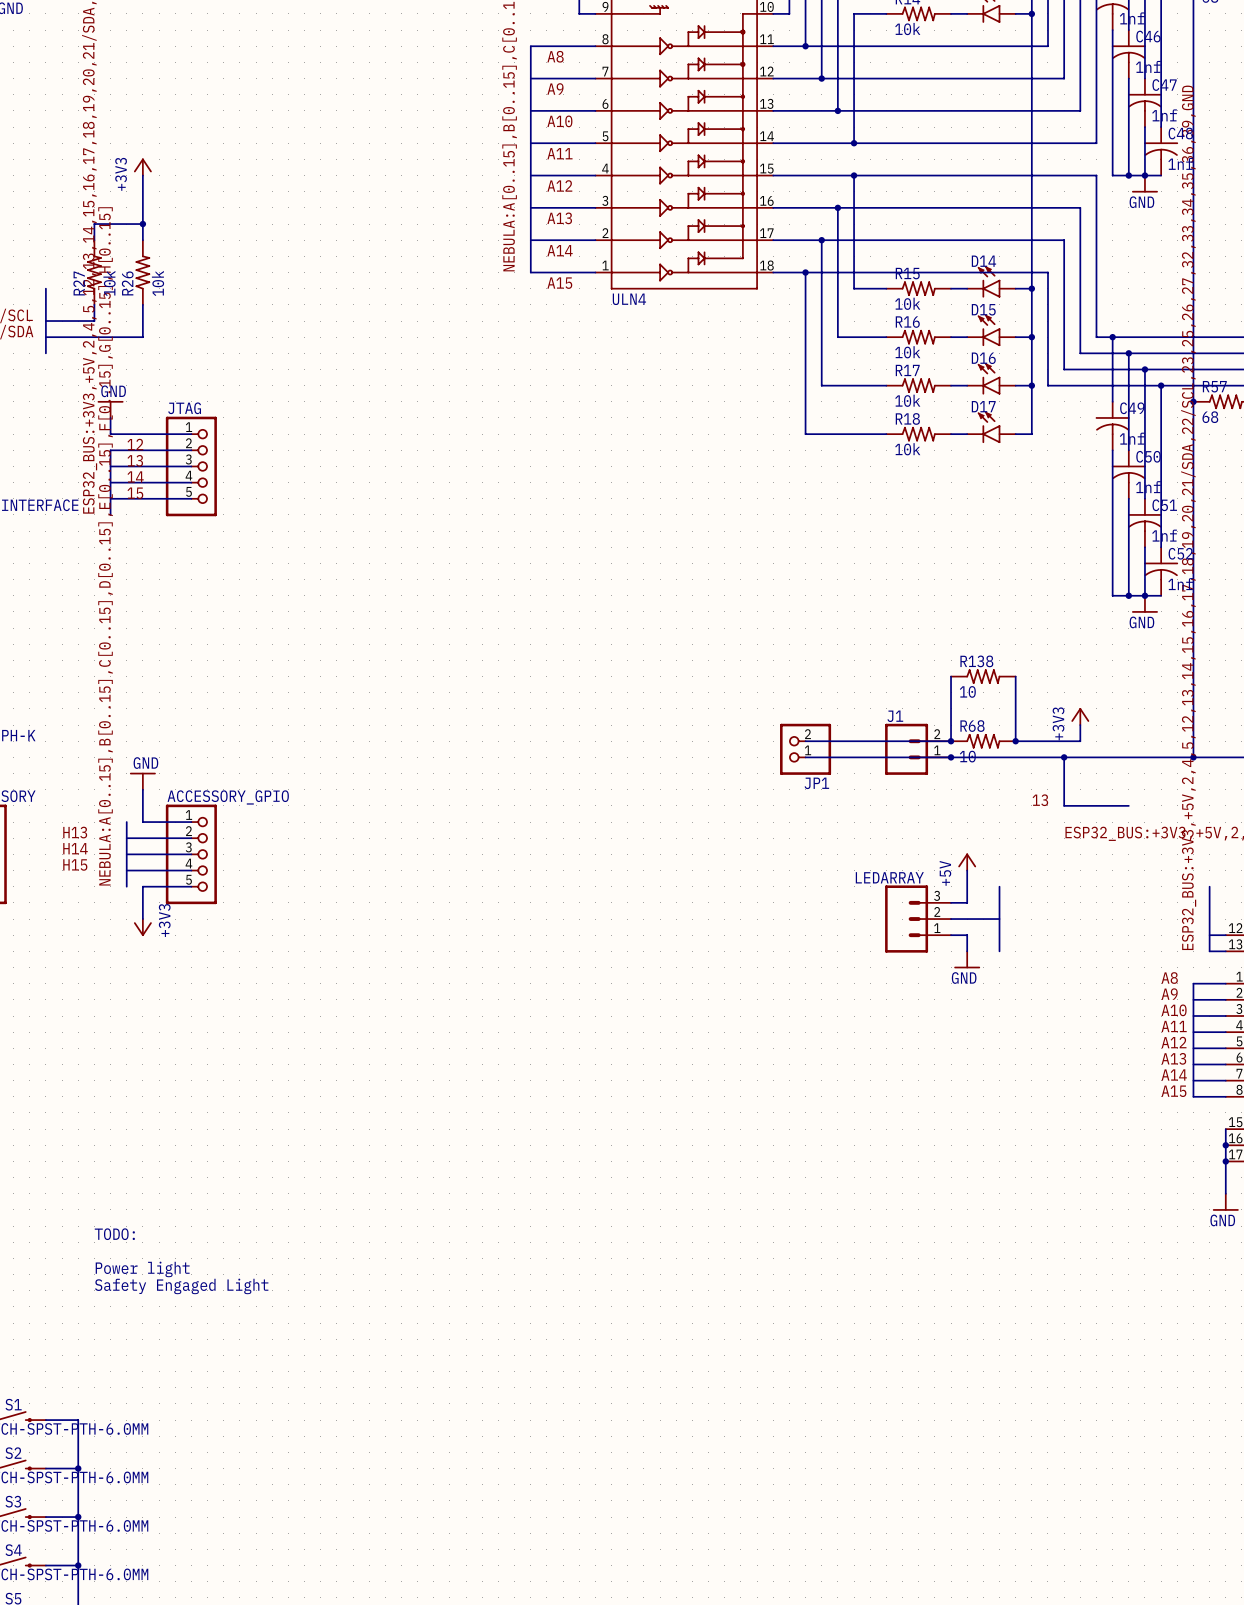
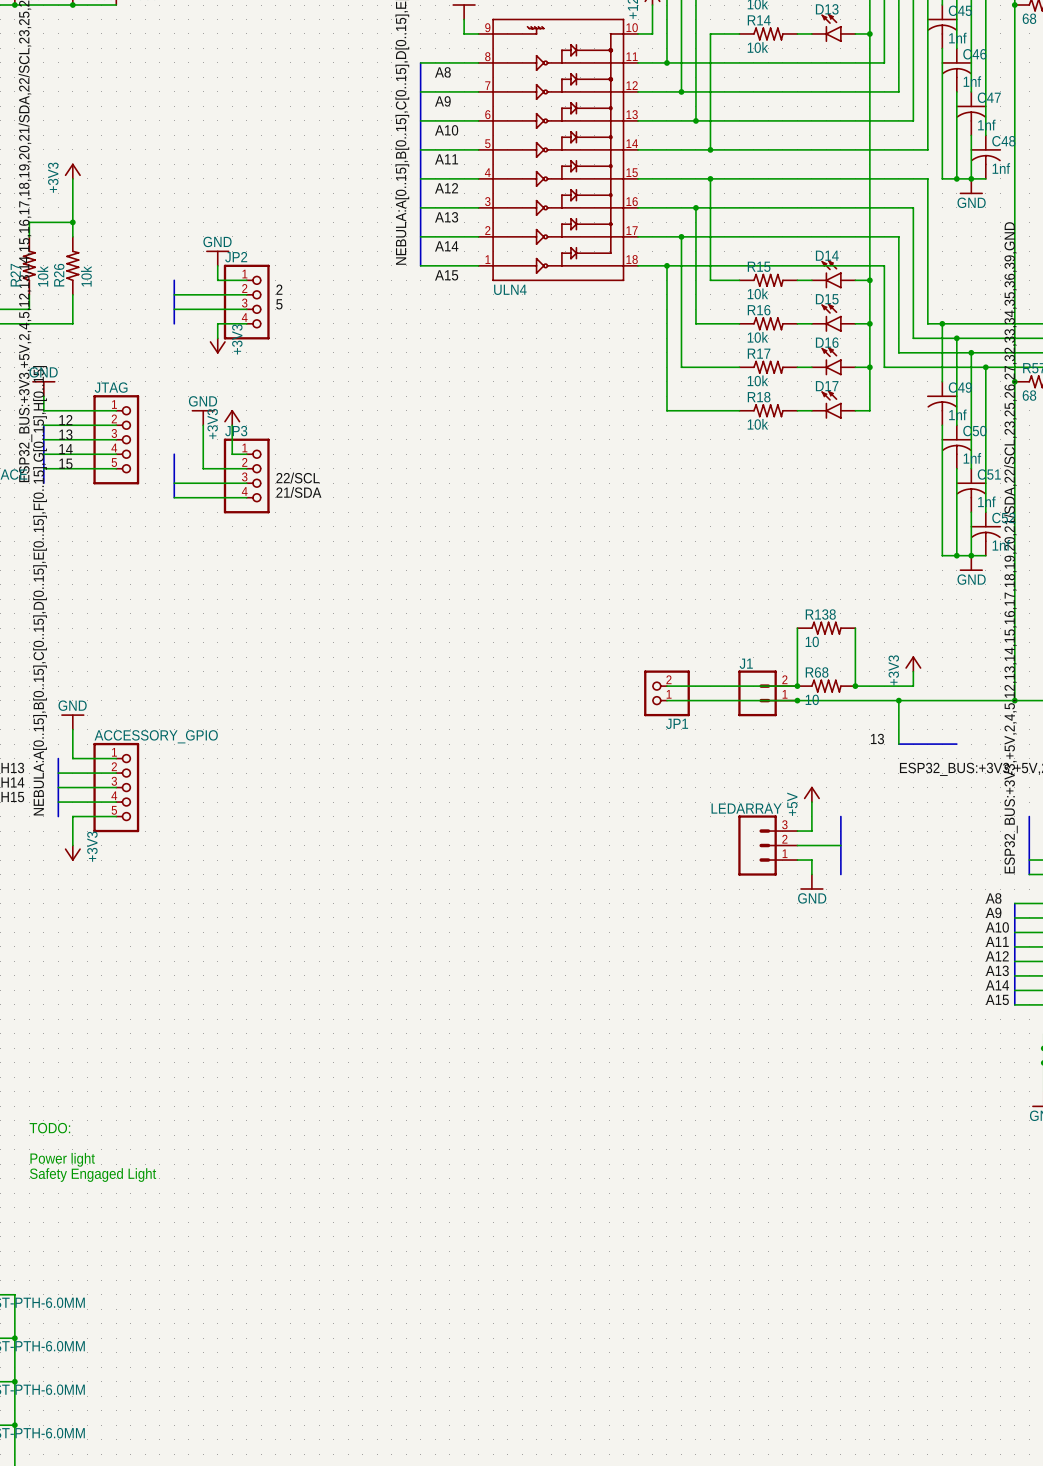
power symbol: none -> GND (217, 258)
wire: none -> (217, 265) (217, 280) (246, 280)
bus: none -> (174, 280) (174, 323)
label: none -> 2 (279, 289)
wire: none -> (174, 294) (246, 294)
JP2: none -> (246, 302)
label: none -> 5 (279, 304)
wire: none -> (174, 309) (246, 309)
wire: none -> (246, 323) (217, 323) (217, 338)
power symbol: none -> +3V3 (217, 345)
power symbol: none -> GND (203, 417)
power symbol: none -> +3V3 (232, 417)
wire: none -> (203, 425) (203, 468) (246, 468)
wire: none -> (232, 425) (232, 454) (246, 454)
bus: none -> (174, 454) (174, 497)
JP3: none -> (246, 475)
label: none -> 22/SCL (297, 477)
wire: none -> (174, 483) (246, 483)
label: none -> 21/SDA (298, 492)
wire: none -> (174, 497) (246, 497)

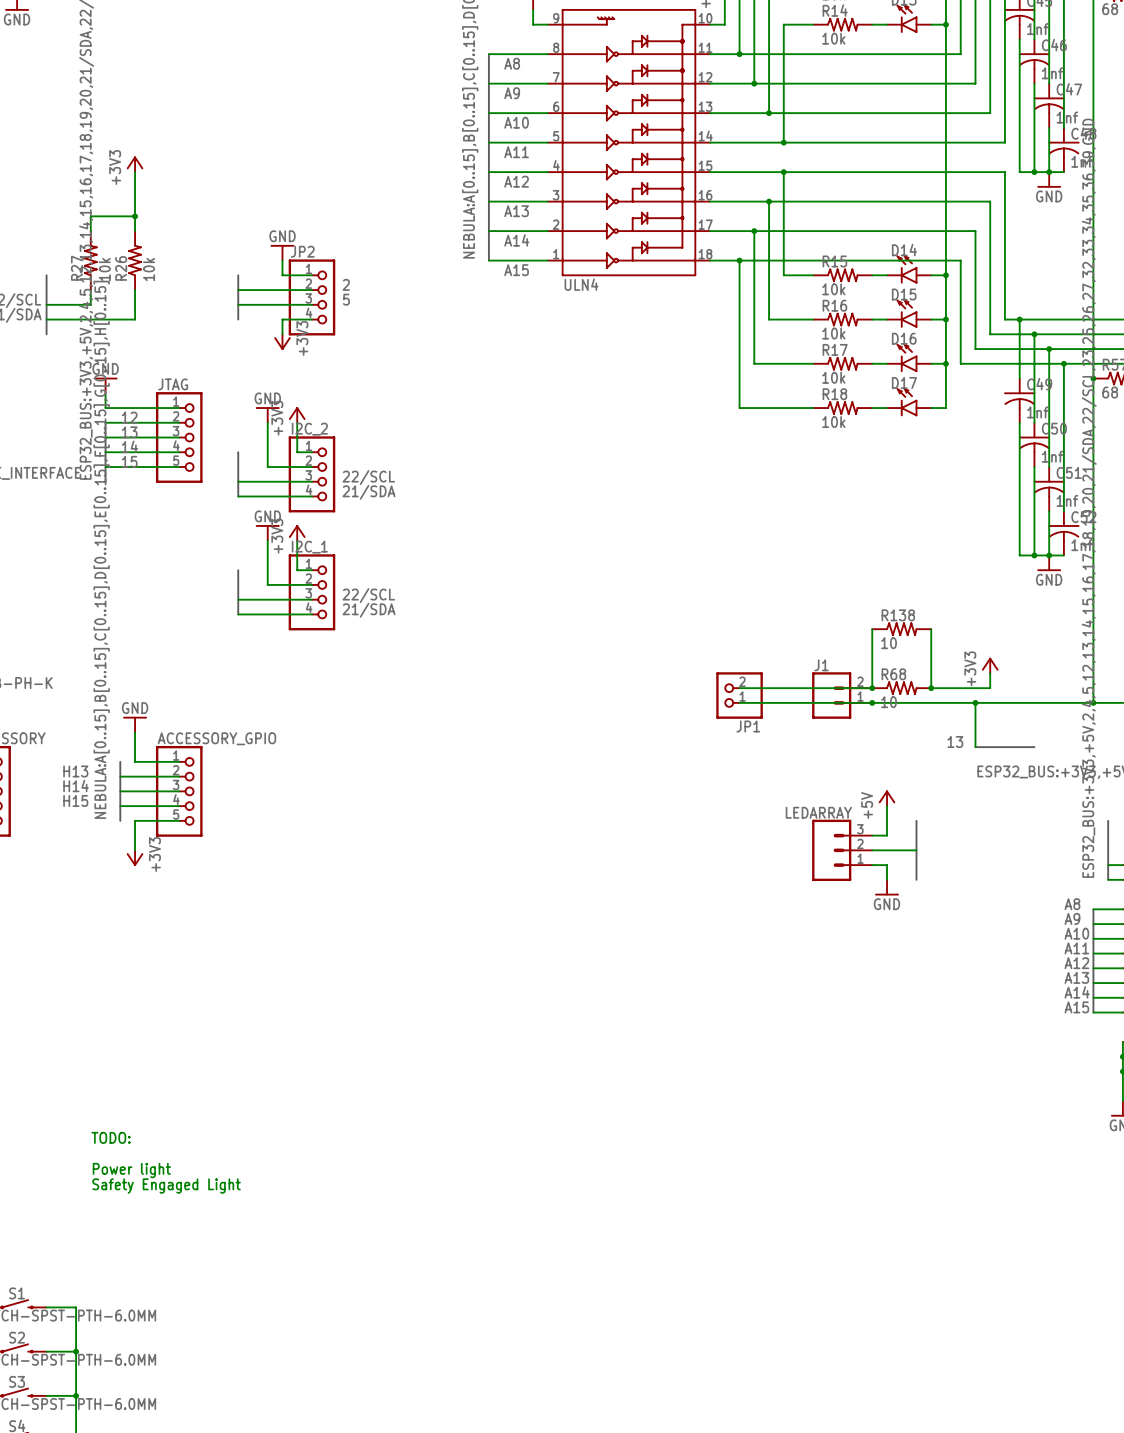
JP3 name: JP3 (236, 431) -> I2C_2 (309, 429)
power symbol: none -> GND (267, 532)
power symbol: none -> +3V3 (297, 532)
wire: none -> (267, 540) (267, 584) (311, 584)
wire: none -> (297, 540) (297, 570) (311, 570)
bus: none -> (238, 570) (238, 614)
I2C_1: none -> (311, 592)
label: none -> 22/SCL (368, 595)
wire: none -> (238, 599) (311, 599)
label: none -> 21/SDA (368, 610)
wire: none -> (238, 614) (311, 614)

